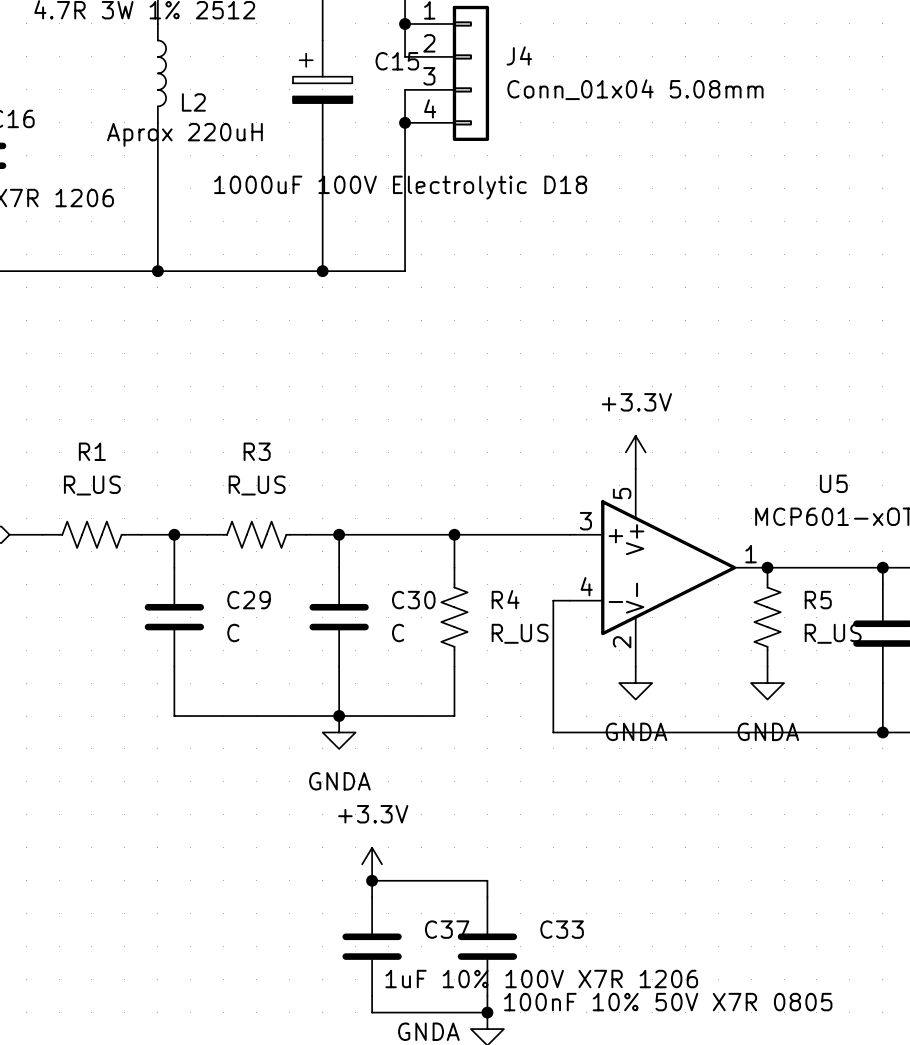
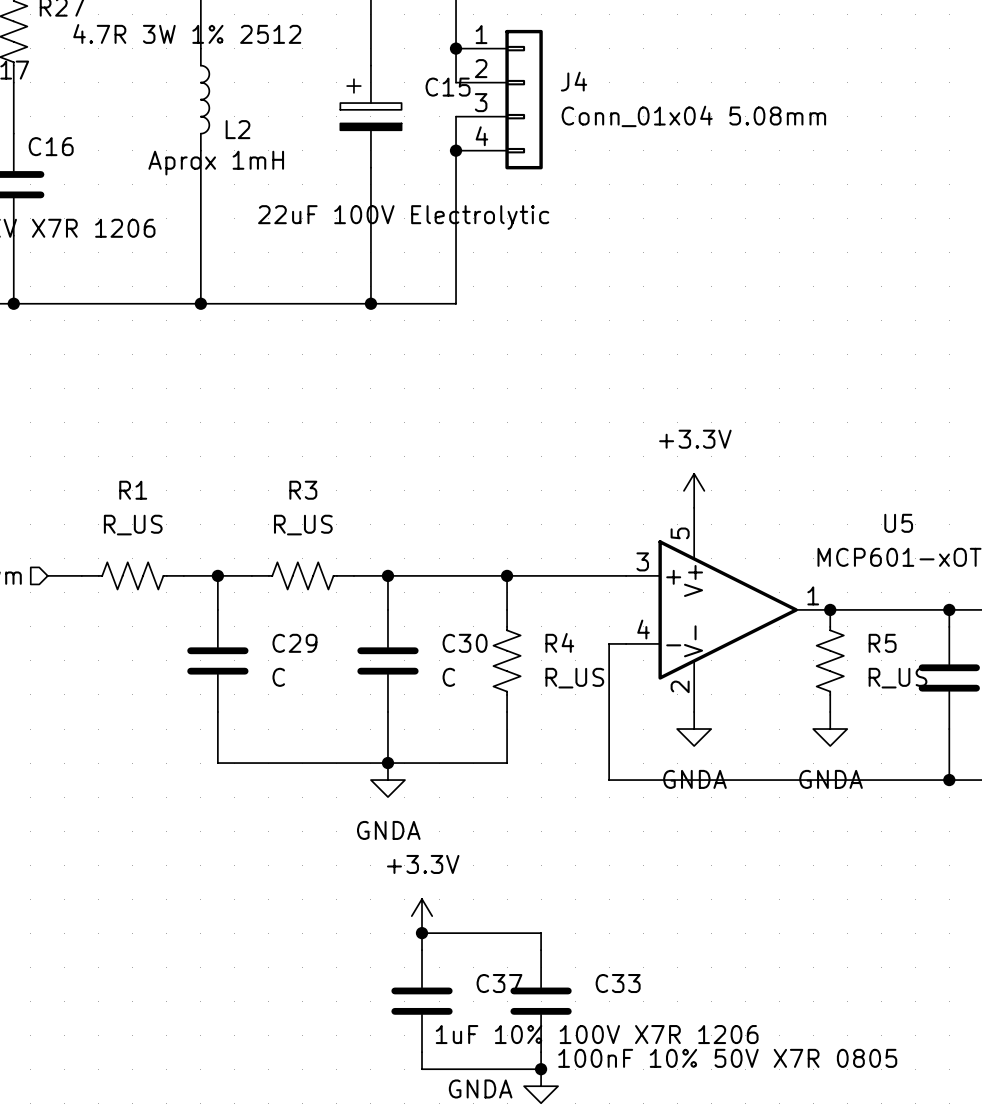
L2 value: Aprox 220uH (184, 134) -> Aprox 1mH (216, 163)
C15 value: 1000uF 100V Electrolytic D18 (400, 187) -> 22uF 100V Electrolytic (403, 217)

